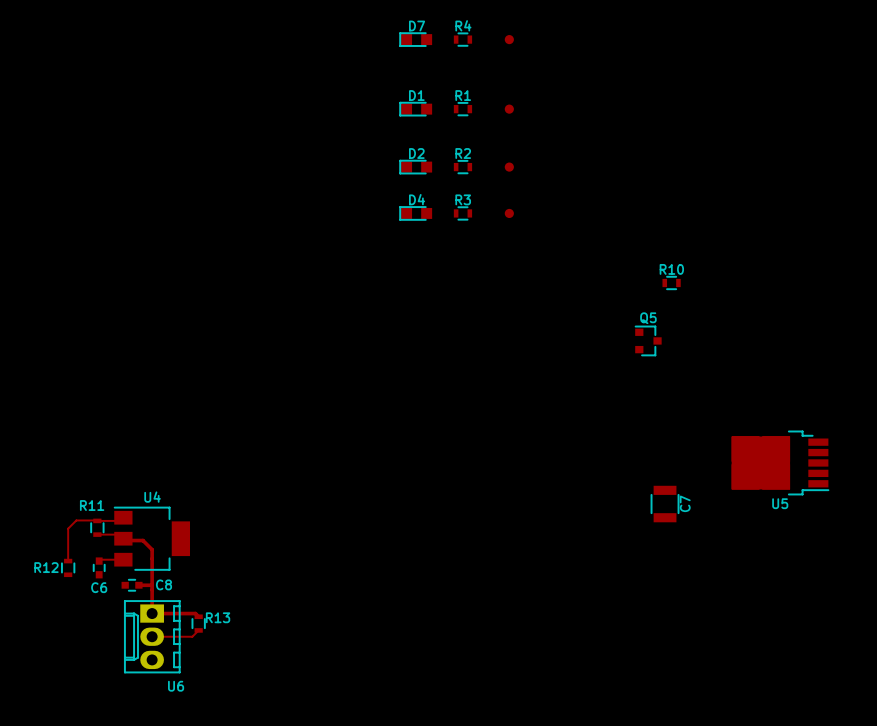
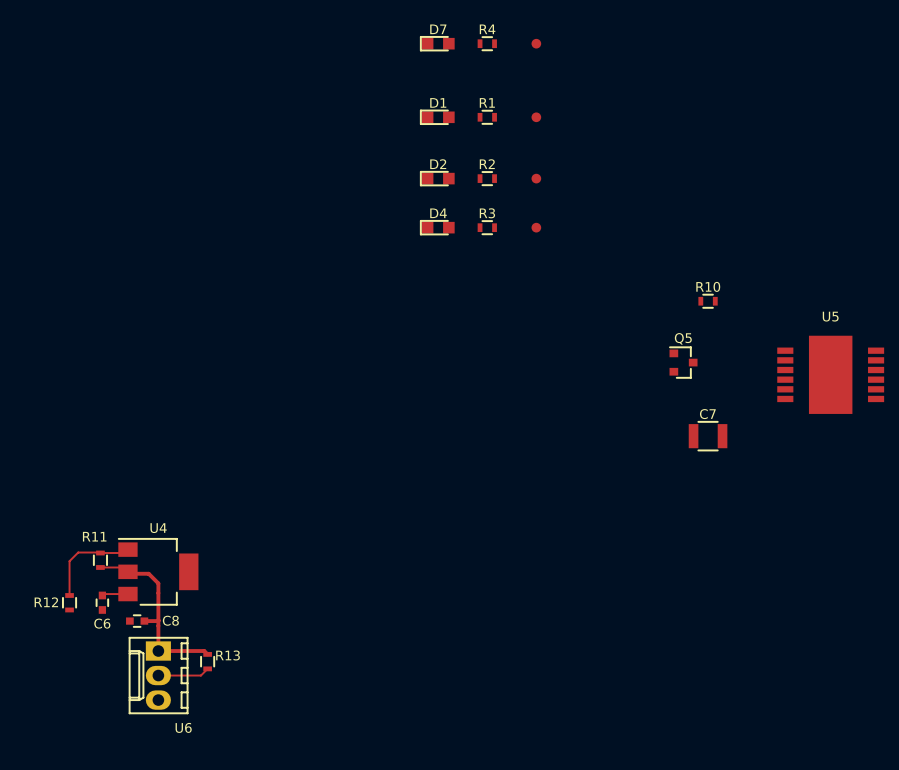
U5 footprint: [731, 430, 829, 496] -> [777, 335, 885, 414]
C7 name position: C7 (685, 503) -> C7 (707, 414)
U5 name position: U5 (780, 503) -> U5 (830, 316)
C7 rotation: 0° (665, 504) -> 90° clockwise (708, 436)
C7 position: (665, 504) -> (708, 436)

